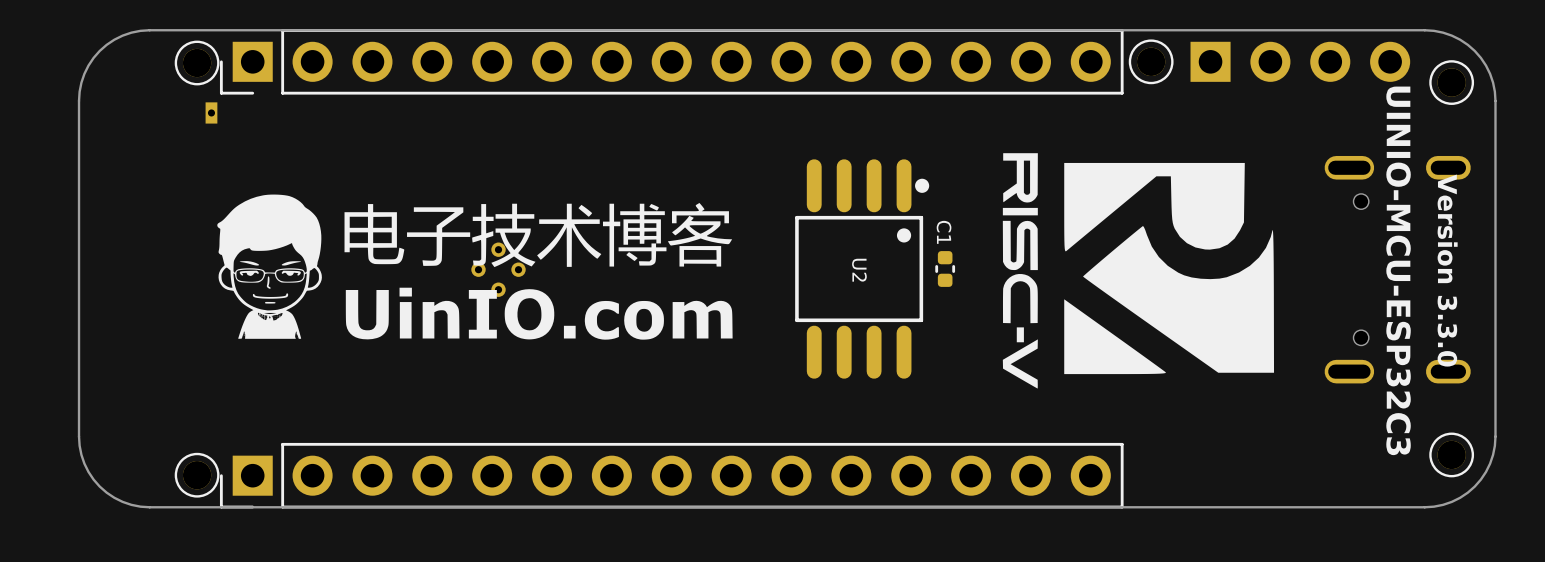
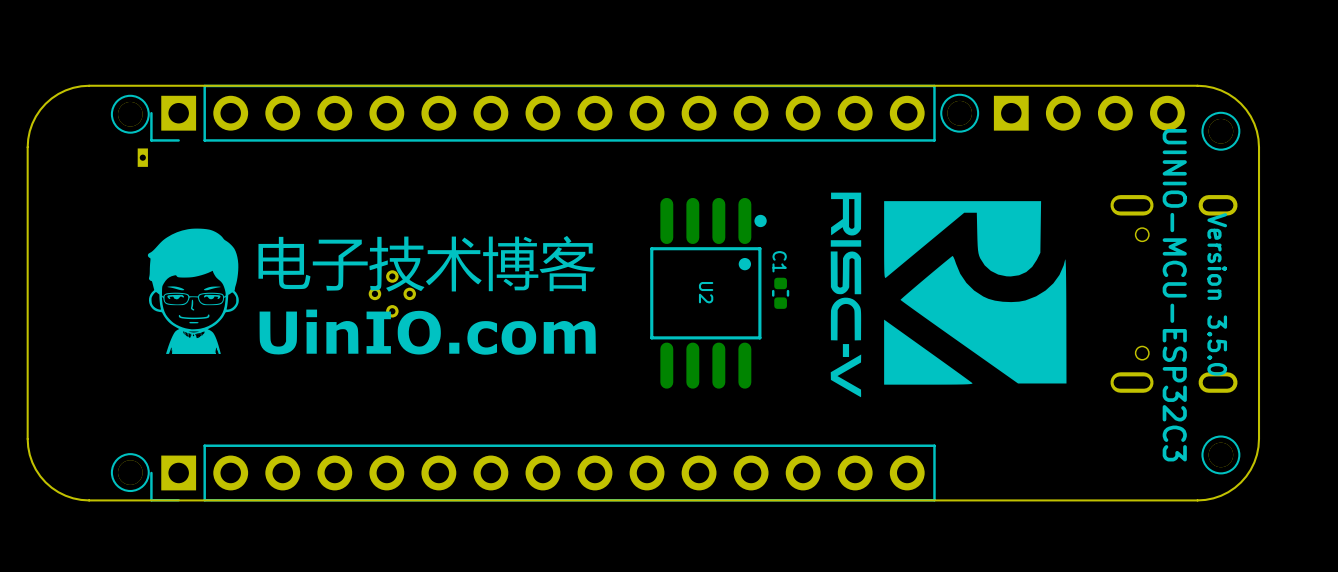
text: Version 3.3.0 (1447, 270) -> Version 3.5.0 (1217, 294)

